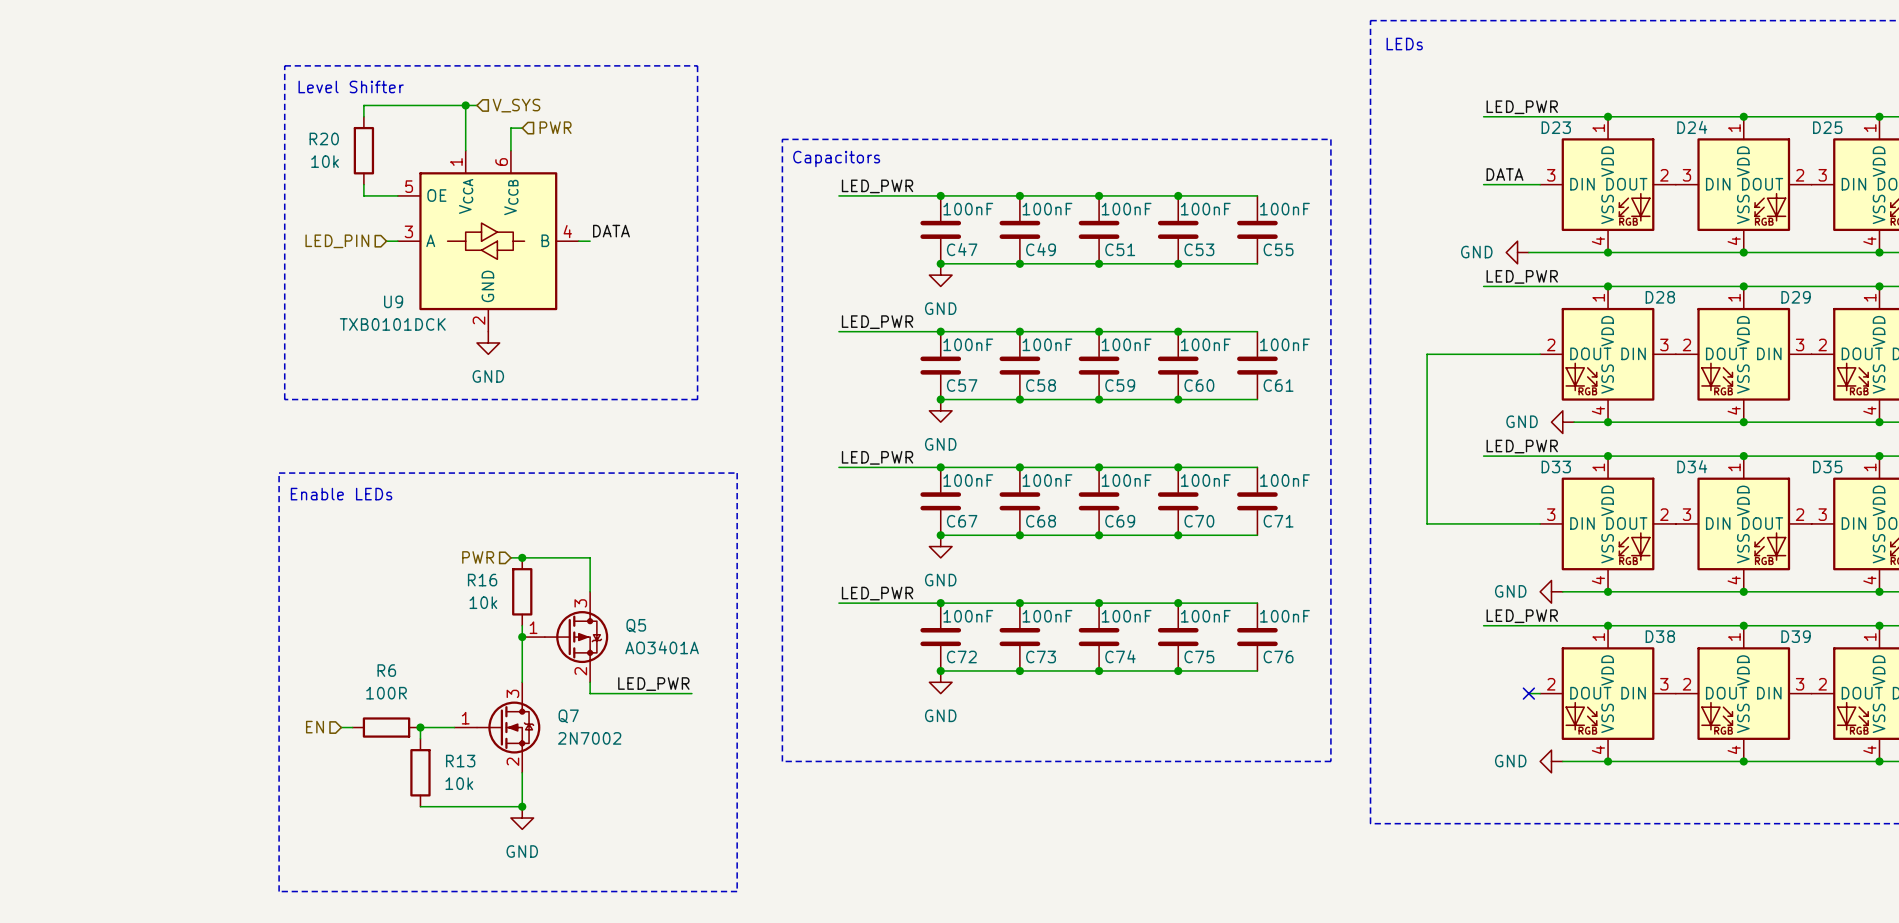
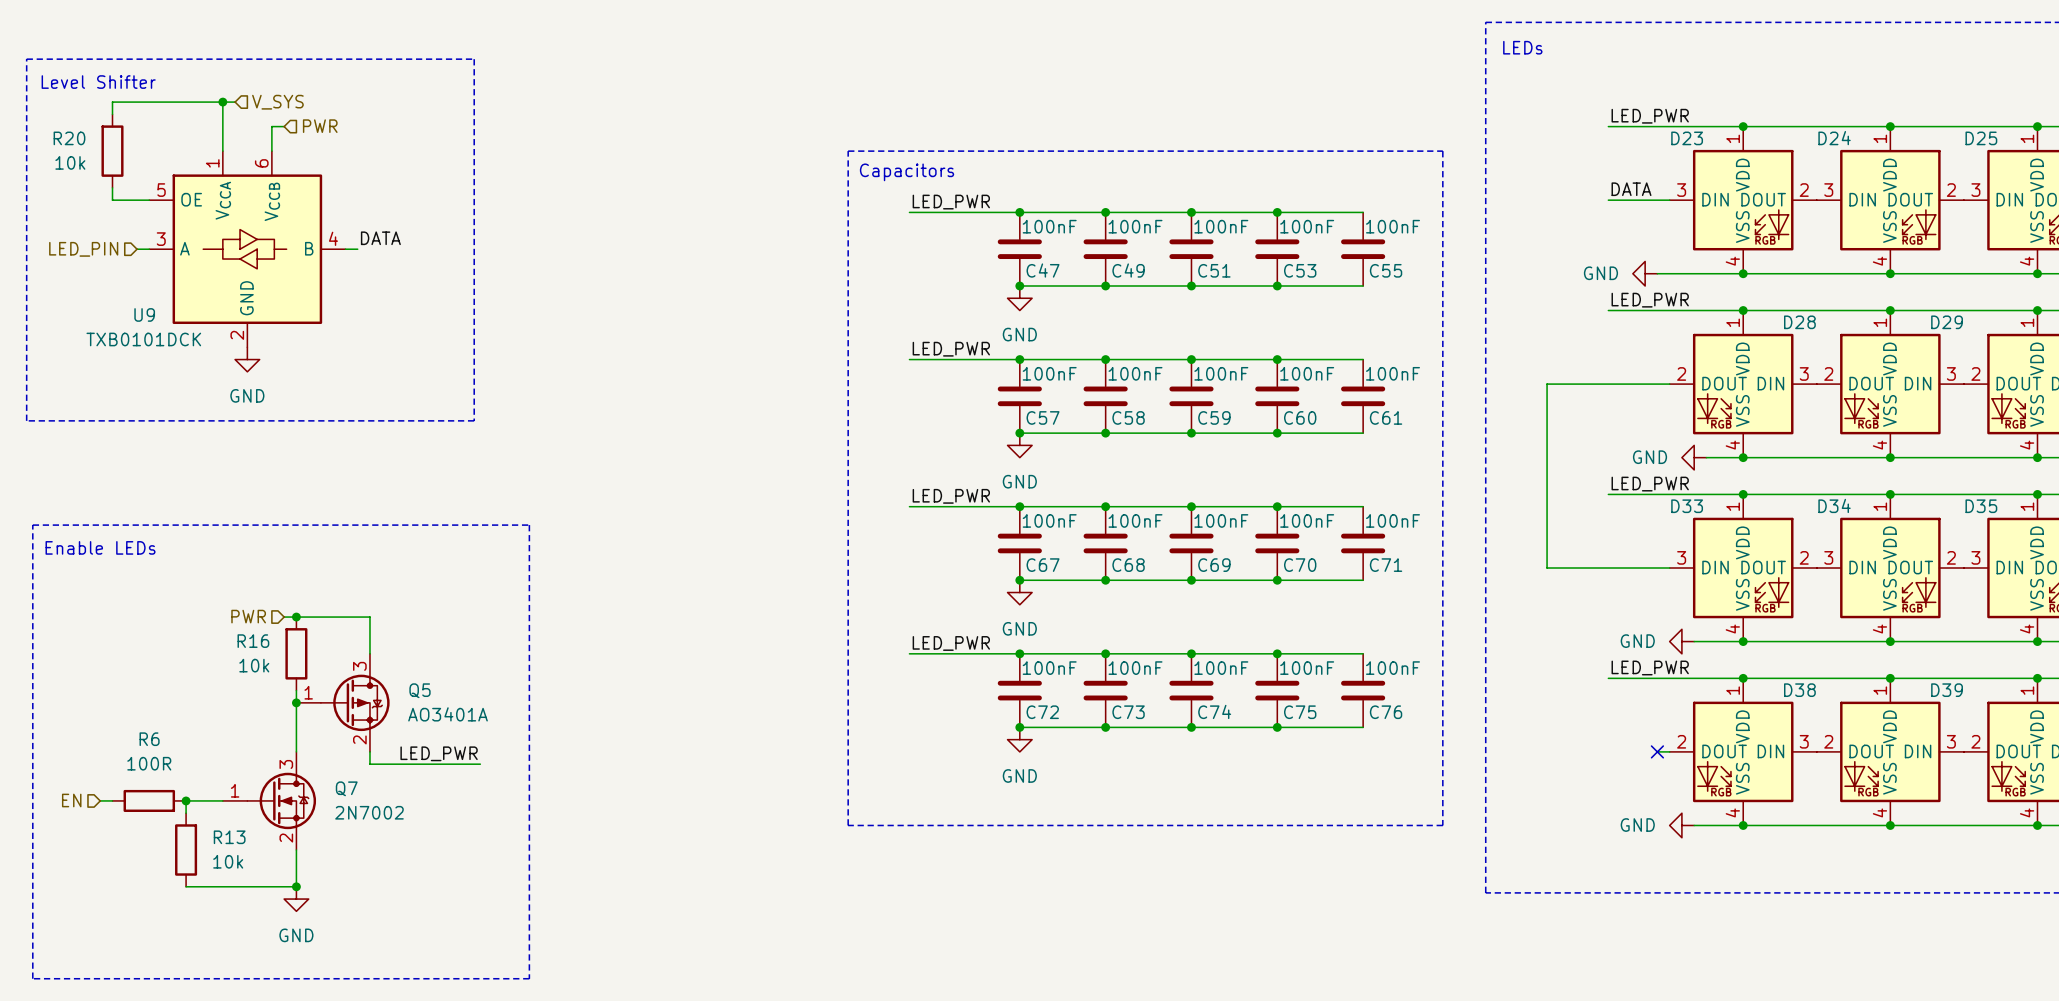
line: none -> (26, 59) (474, 59) (474, 420) (26, 420) (26, 59)
line: (284, 65) (697, 65) (697, 399) (284, 399) (284, 65) -> none
text: none -> Level Shifter (98, 82)
text: Level Shifter (351, 86) -> none
wire: none -> (222, 102) (222, 151)
junction: none -> (222, 102)
wire: none -> (235, 102) (112, 102) (112, 114)
hierarchical label: none -> V_SYS (277, 102)
wire: (465, 105) (465, 150) -> none
junction: (465, 105) -> none
wire: (477, 105) (363, 105) (363, 116) -> none
hierarchical label: V_SYS (516, 105) -> none
wire: none -> (284, 126) (271, 126) (271, 151)
hierarchical label: none -> PWR (320, 126)
hierarchical label: PWR (555, 127) -> none
wire: (522, 128) (510, 128) (510, 150) -> none
R20 position: (363, 150) -> (112, 151)
wire: none -> (112, 187) (112, 200) (149, 200)
wire: (363, 184) (363, 195) (397, 195) -> none
label: none -> DATA (380, 238)
wire: none -> (137, 249) (149, 249)
hierarchical label: none -> LED_PIN (83, 249)
label: DATA (611, 231) -> none
hierarchical label: LED_PIN (337, 241) -> none
wire: (386, 241) (397, 241) -> (345, 249) (357, 249)
U9 position: (488, 241) -> (247, 249)
wire: (578, 241) (590, 241) -> none
power symbol: none -> GND (247, 359)
power symbol: GND (488, 342) -> none
line: (279, 473) (737, 473) (737, 891) (279, 891) (279, 473) -> none
line: none -> (32, 525) (529, 525) (529, 978) (32, 978) (32, 525)
text: Enable LEDs (341, 494) -> none
text: none -> Enable LEDs (100, 547)
hierarchical label: PWR (478, 557) -> none
wire: (510, 557) (590, 557) (590, 591) -> none
junction: (522, 557) -> none
hierarchical label: none -> PWR (248, 616)
wire: none -> (284, 617) (369, 617) (369, 653)
junction: none -> (296, 617)
R16 position: (522, 591) -> (296, 653)
wire: (522, 625) (522, 682) -> none
wire: none -> (296, 690) (296, 751)
junction: (522, 637) -> none
Q5 position: (565, 637) -> (343, 702)
junction: none -> (296, 702)
wire: (590, 682) (590, 693) (691, 693) -> none
label: LED_PWR (653, 684) -> none
wire: none -> (369, 751) (369, 764) (480, 764)
label: none -> LED_PWR (439, 753)
hierarchical label: EN (314, 727) -> none
wire: (341, 727) (352, 727) -> none
R6 position: (386, 727) -> (149, 800)
junction: (420, 727) -> none
wire: (454, 727) (420, 727) (420, 738) -> none
Q7 position: (497, 727) -> (269, 800)
hierarchical label: none -> EN (71, 800)
wire: none -> (100, 800) (112, 800)
junction: none -> (186, 800)
wire: none -> (222, 800) (186, 800) (186, 813)
R13 position: (420, 772) -> (186, 850)
wire: (522, 772) (522, 806) (420, 806) -> none
wire: none -> (296, 850) (296, 886) (186, 886)
junction: (522, 806) -> none
junction: none -> (296, 886)
power symbol: GND (522, 818) -> none
power symbol: none -> GND (296, 899)

